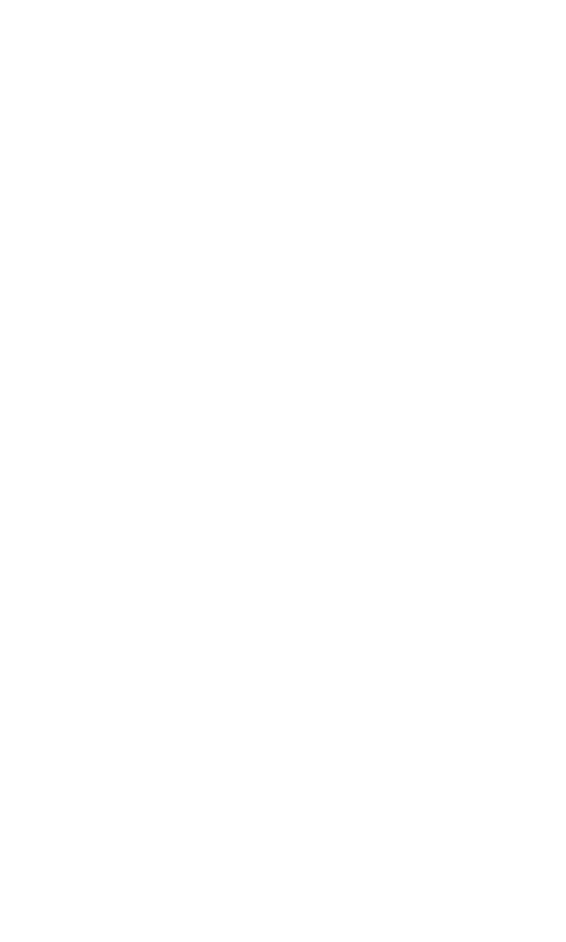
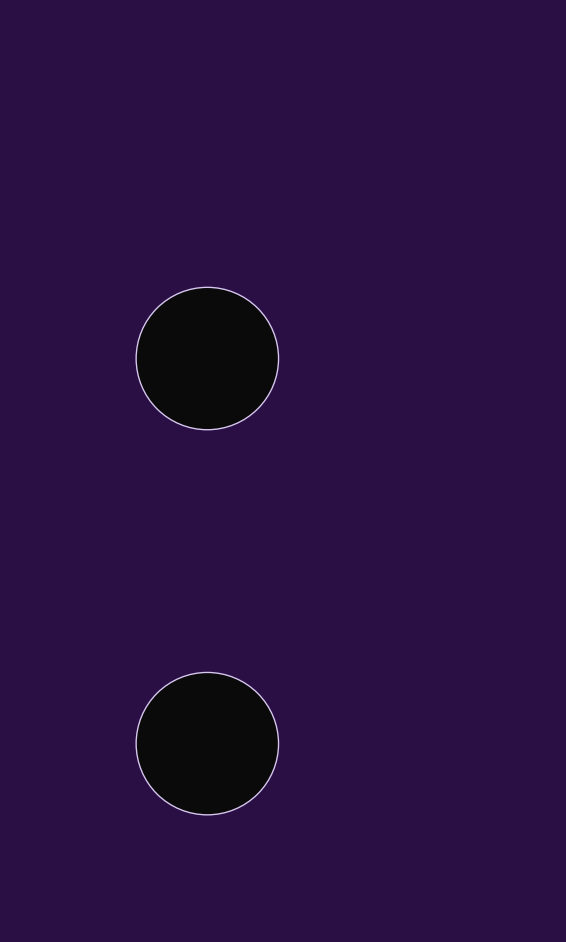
part: none -> (207, 358)
part: none -> (207, 743)

